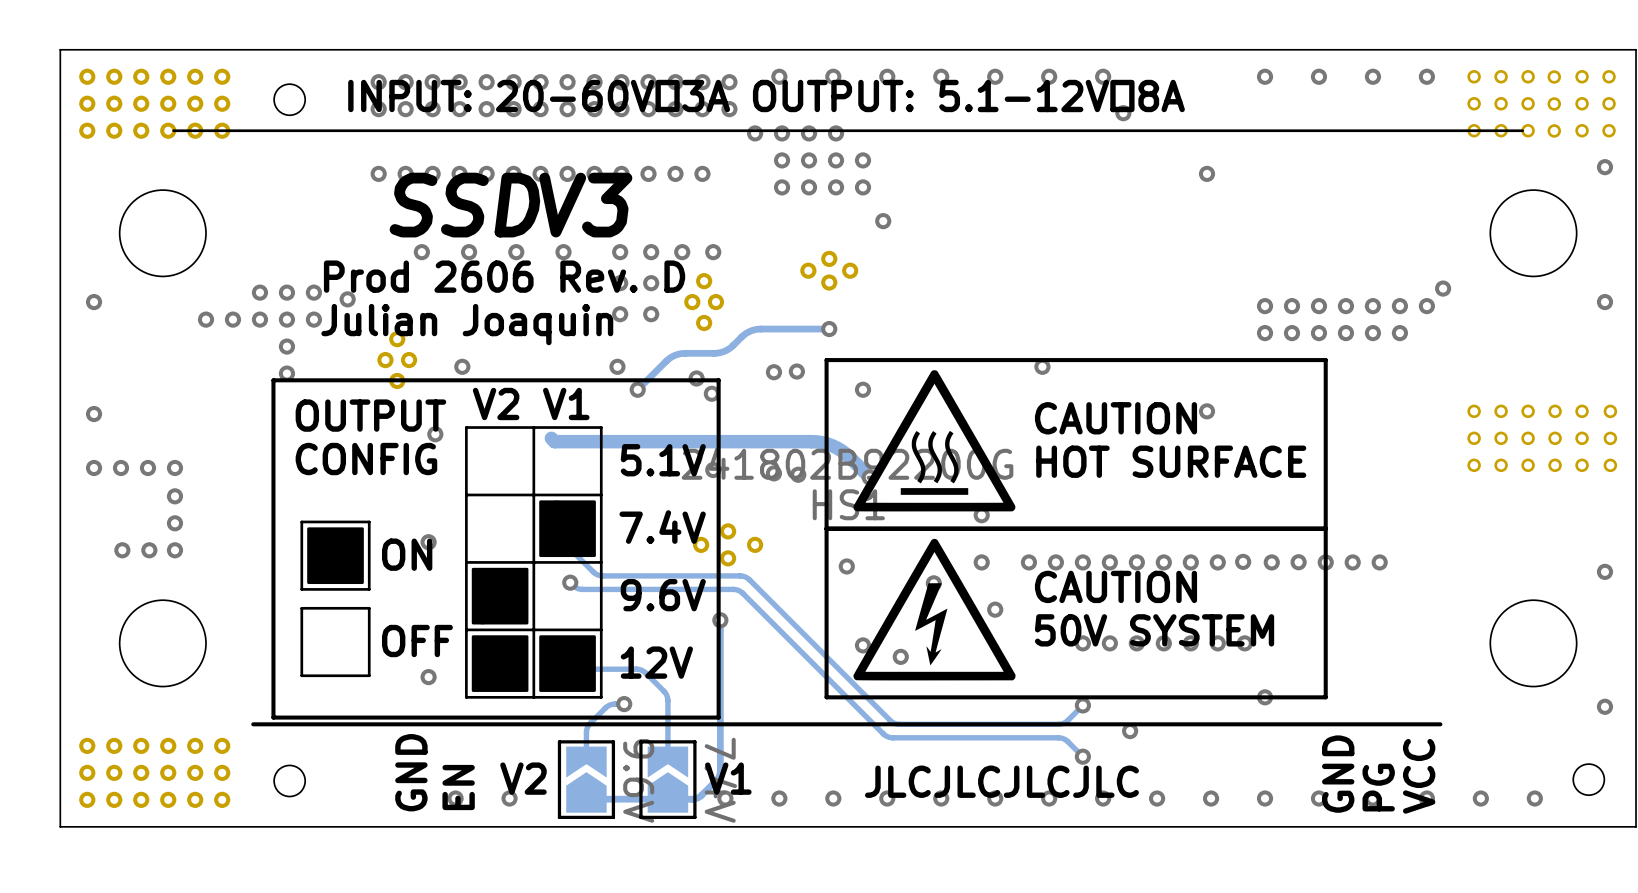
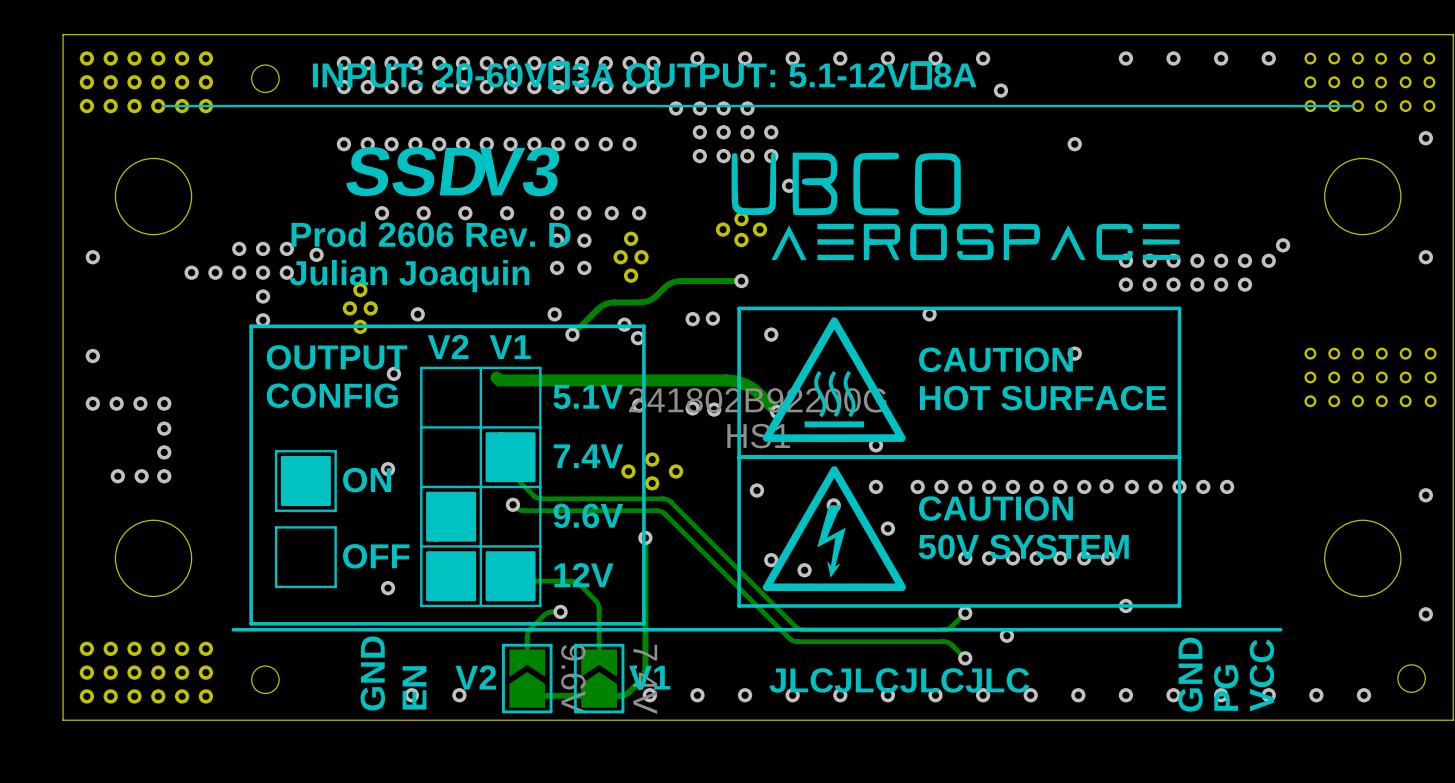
drawing: none -> [731, 152, 1180, 261]

